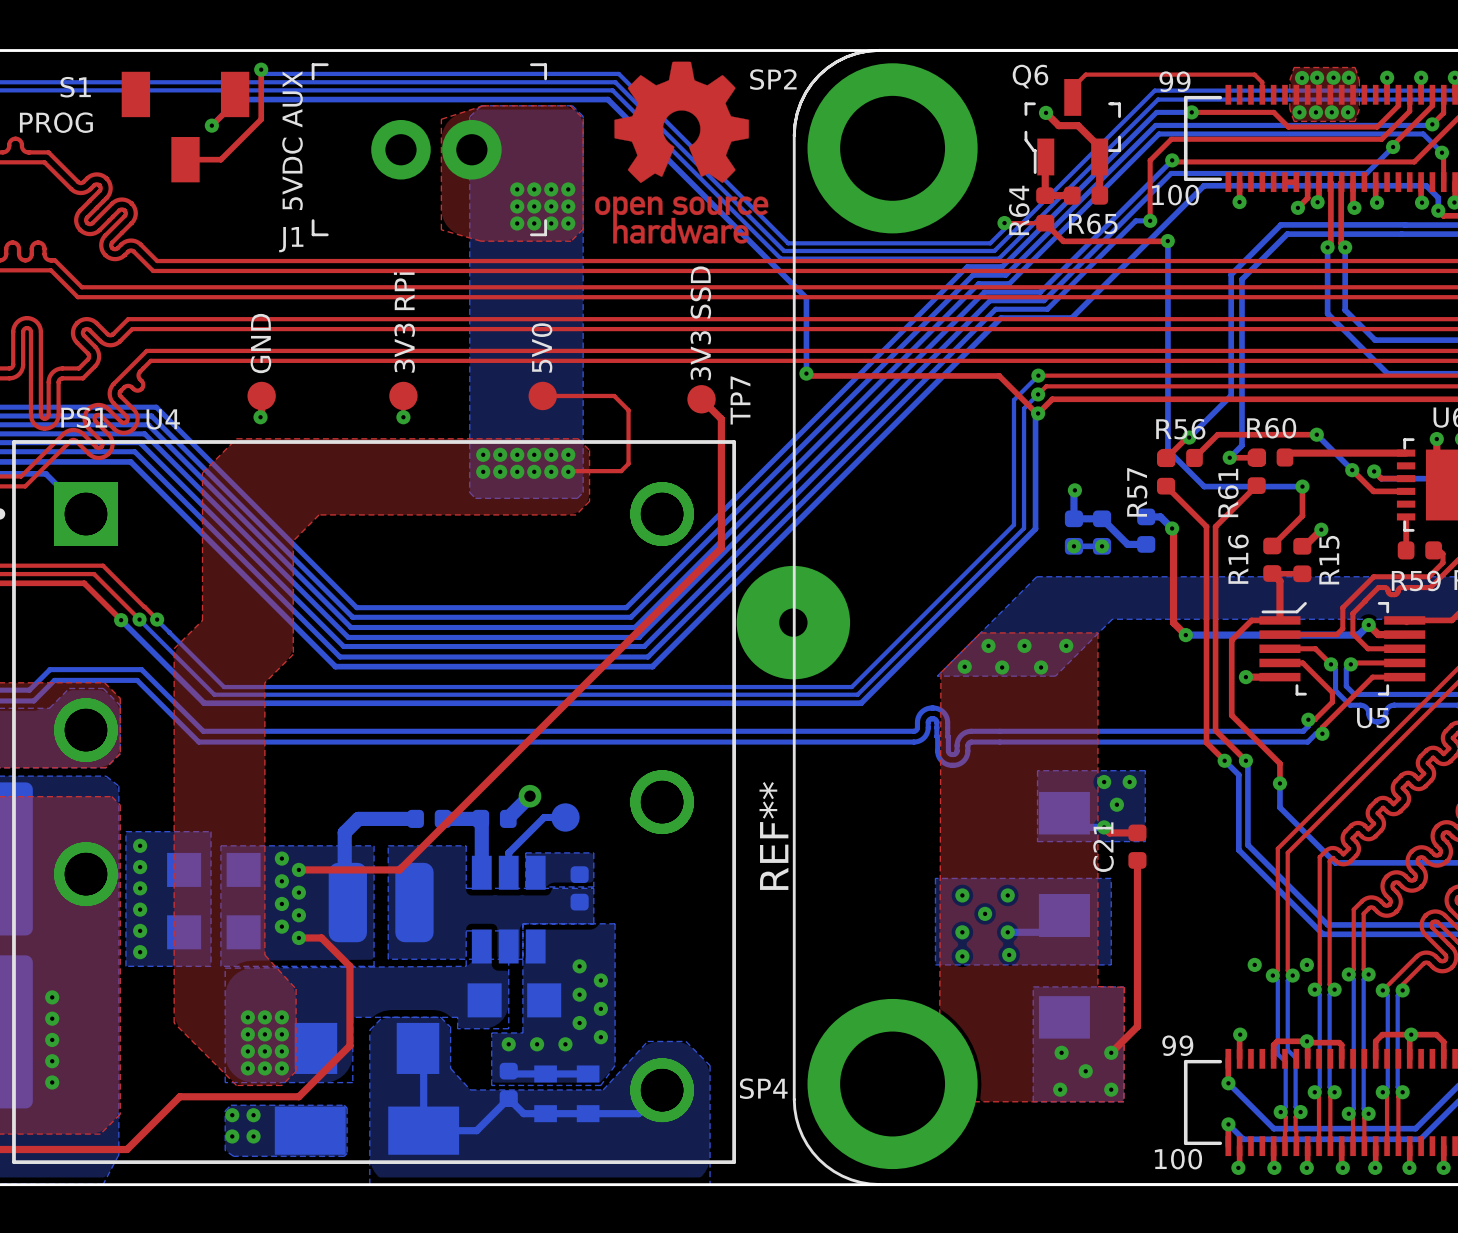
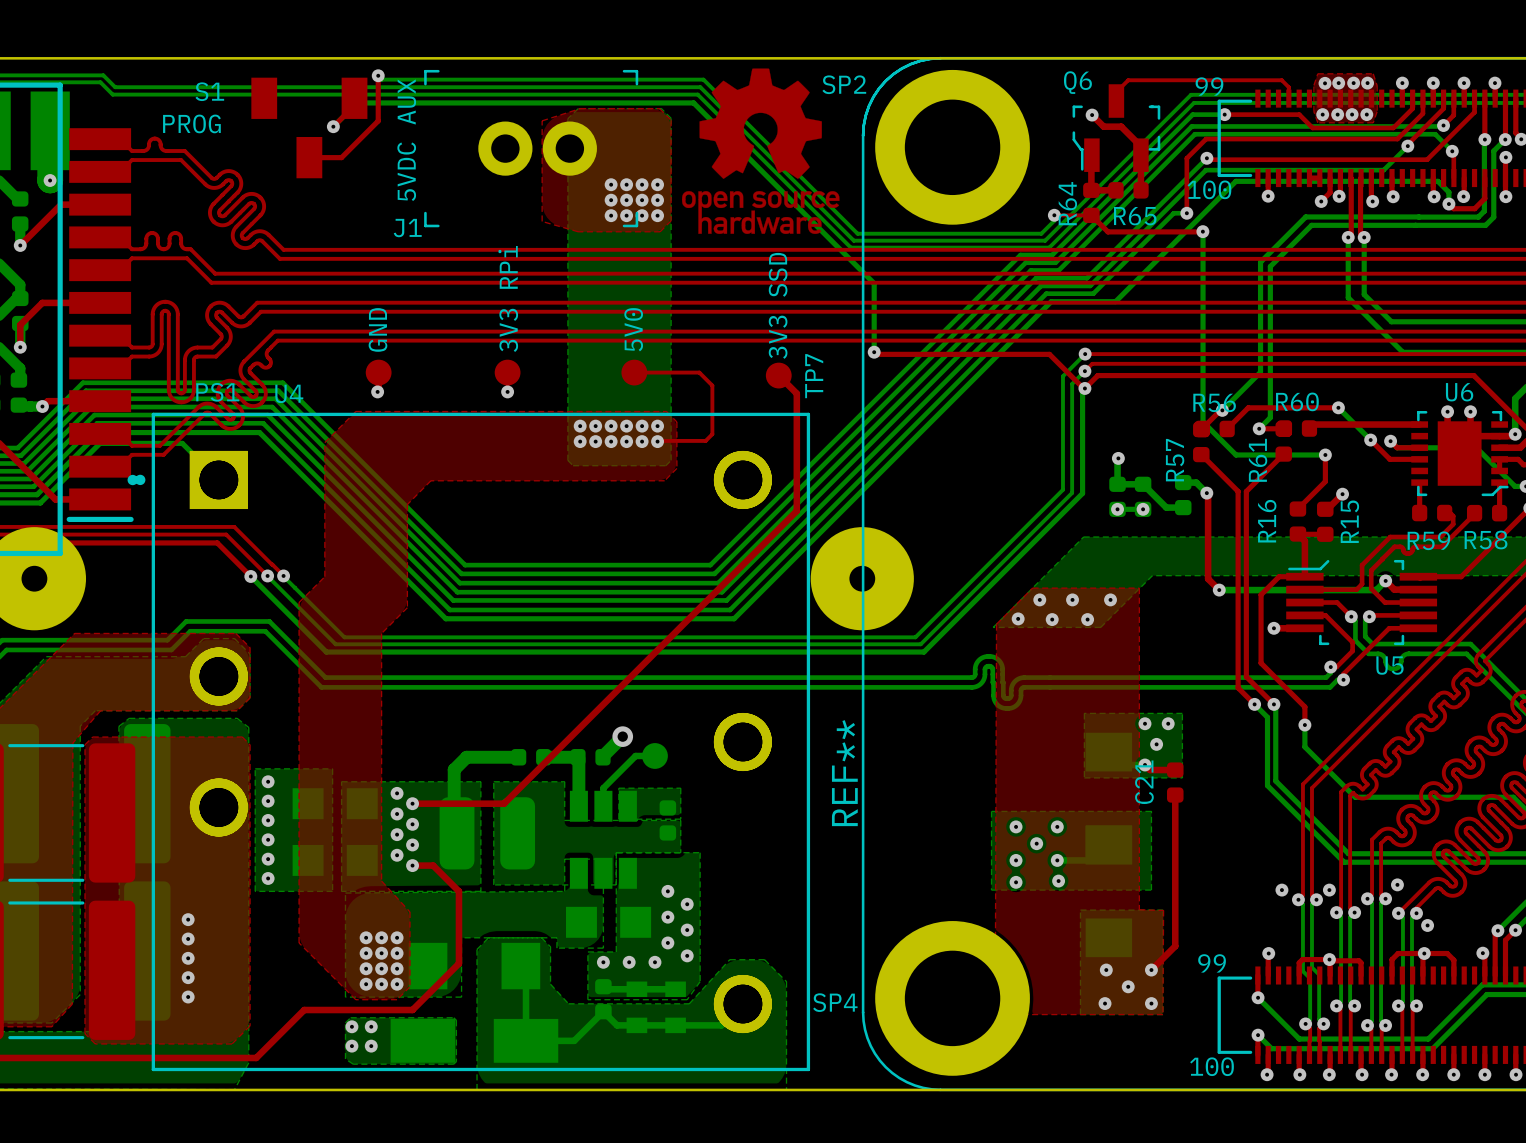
via: none -> (1397, 884)
via: none -> (1427, 925)

